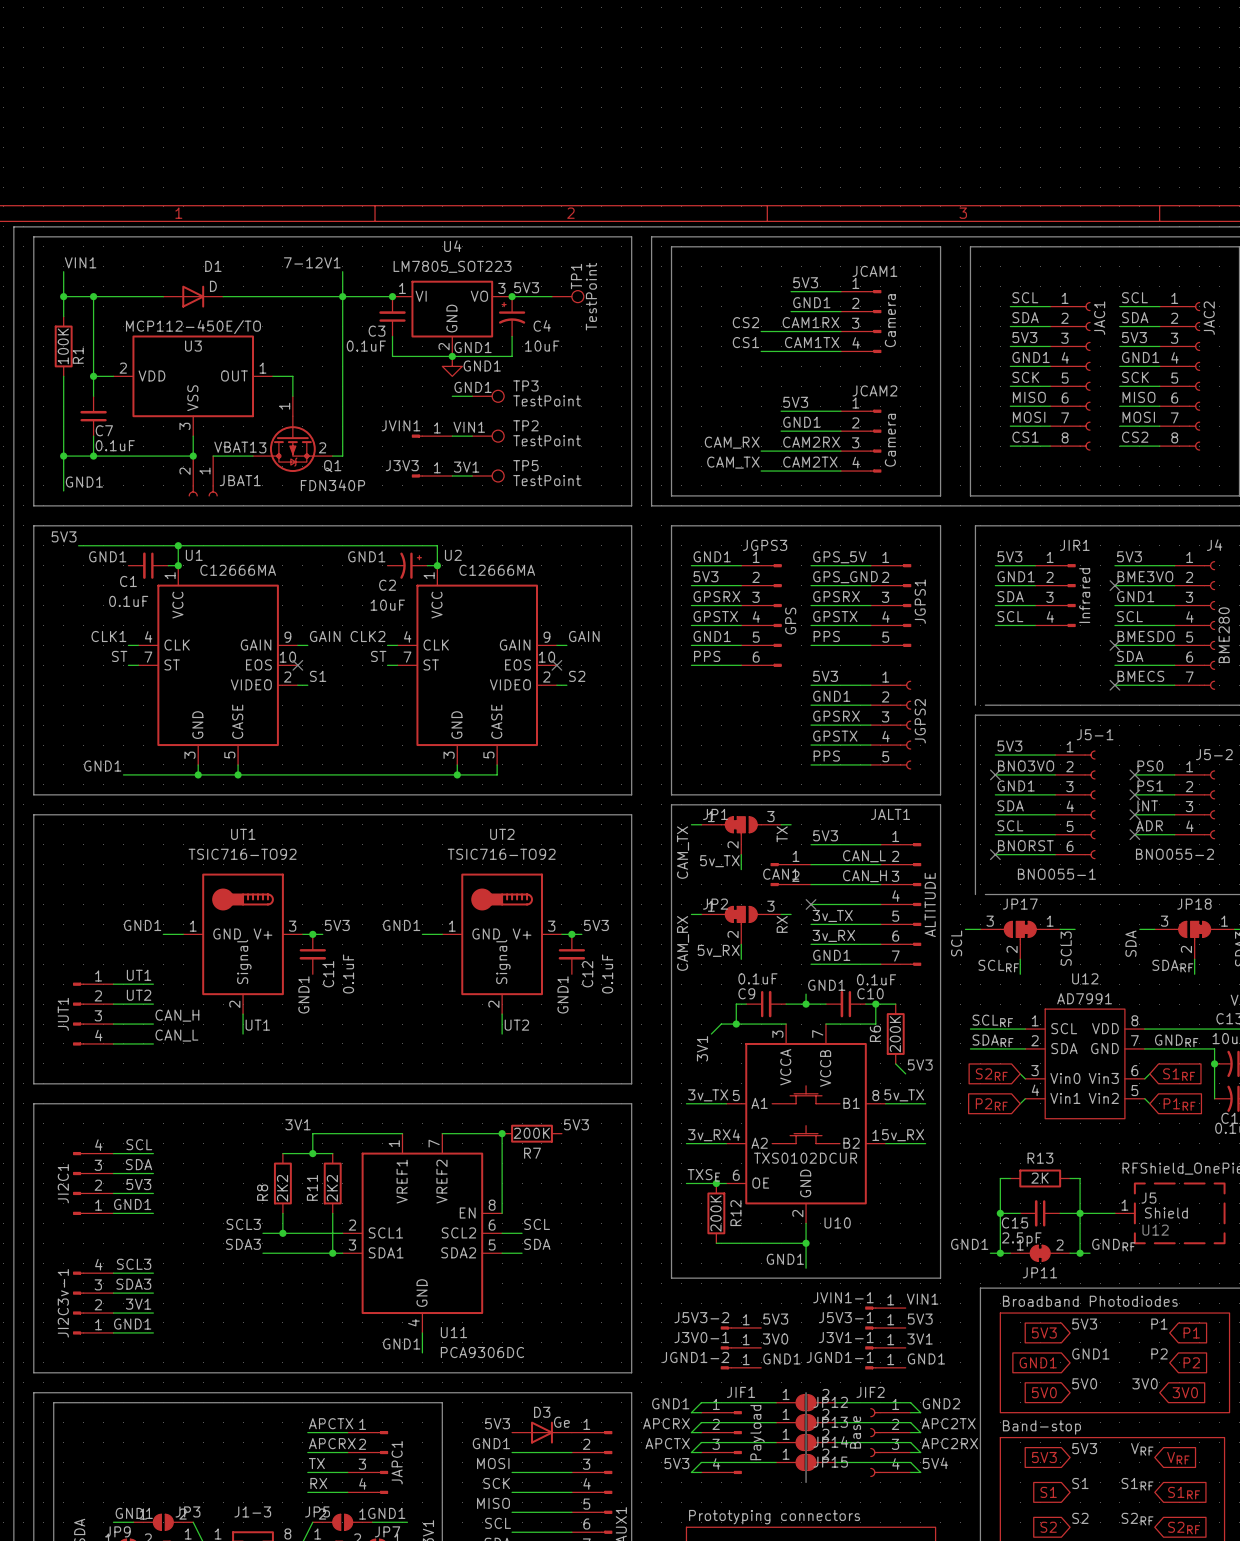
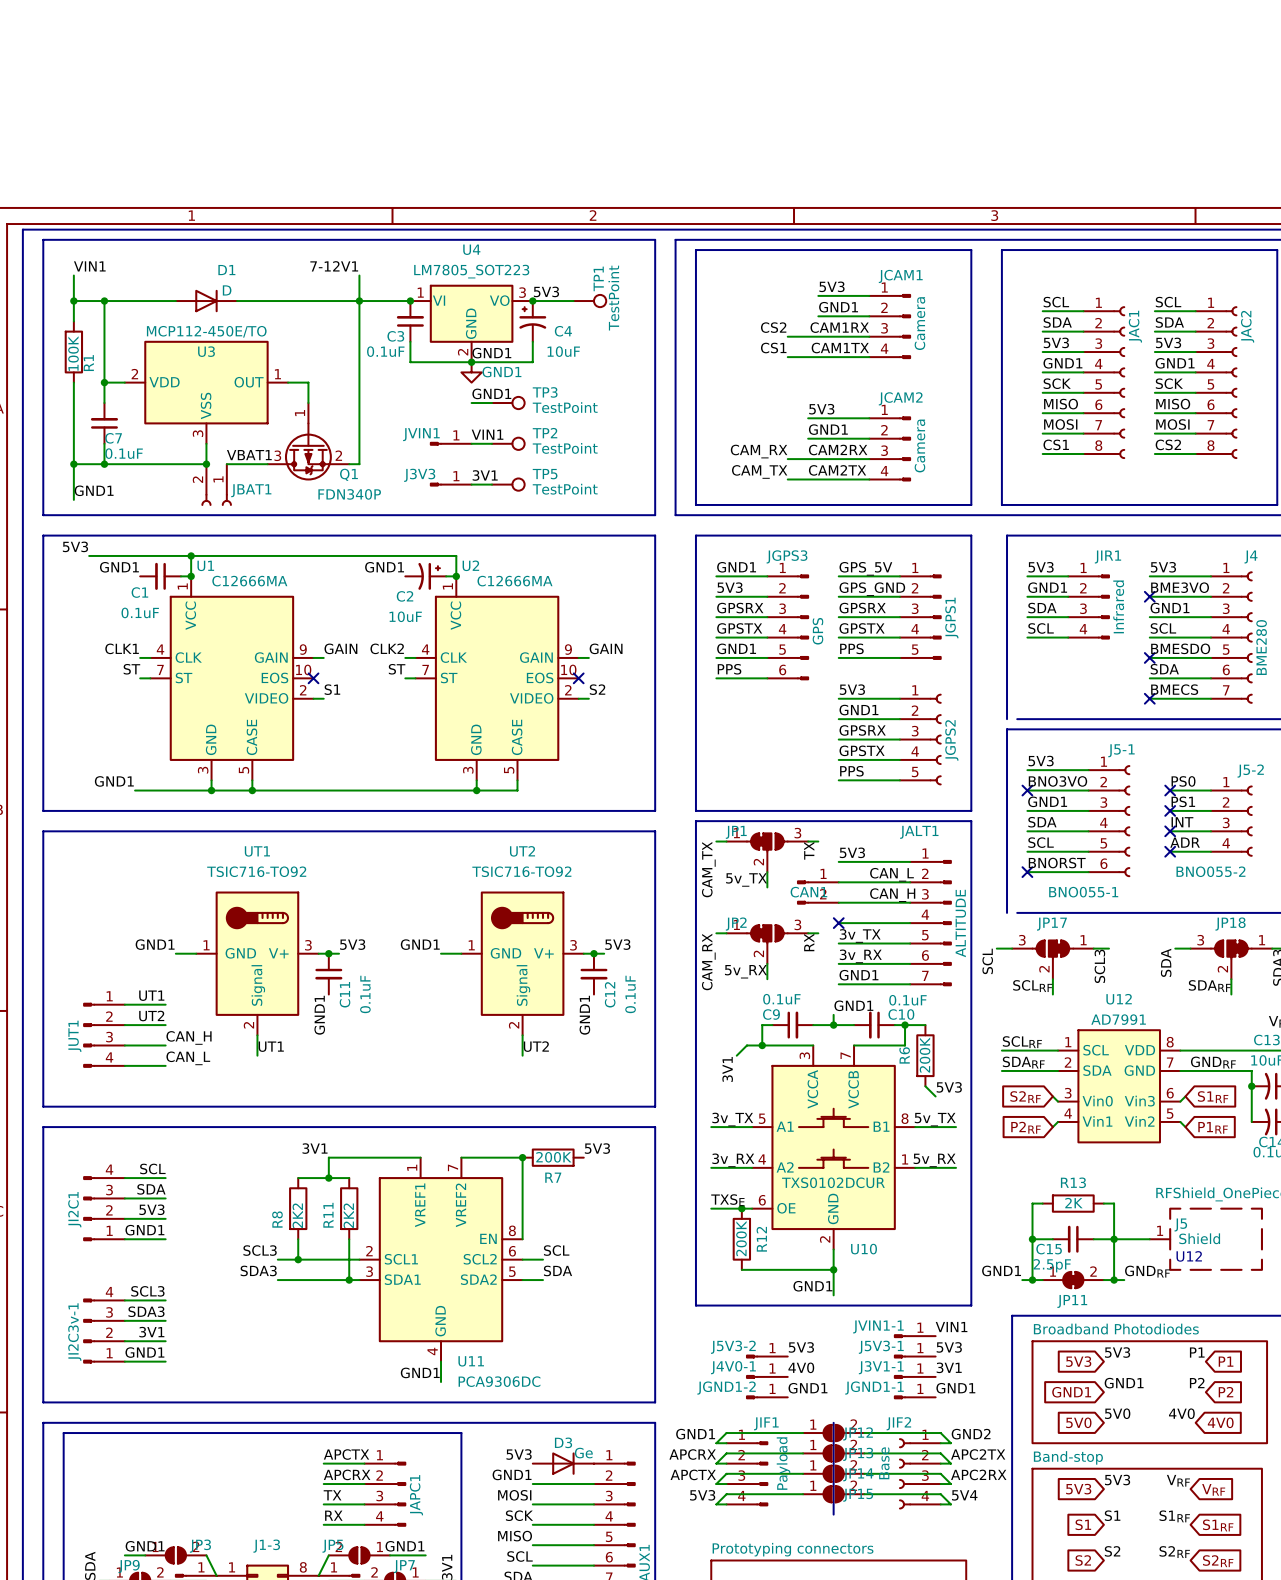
J3V0-1 name: J3V0-1 (701, 1337) -> J4V0-1 (733, 1367)
label: 3V0 (775, 1339) -> 4V0 (801, 1367)
label: 3V0 (1145, 1383) -> 4V0 (1181, 1413)
global label: 3V0 (1185, 1392) -> 4V0 (1220, 1422)

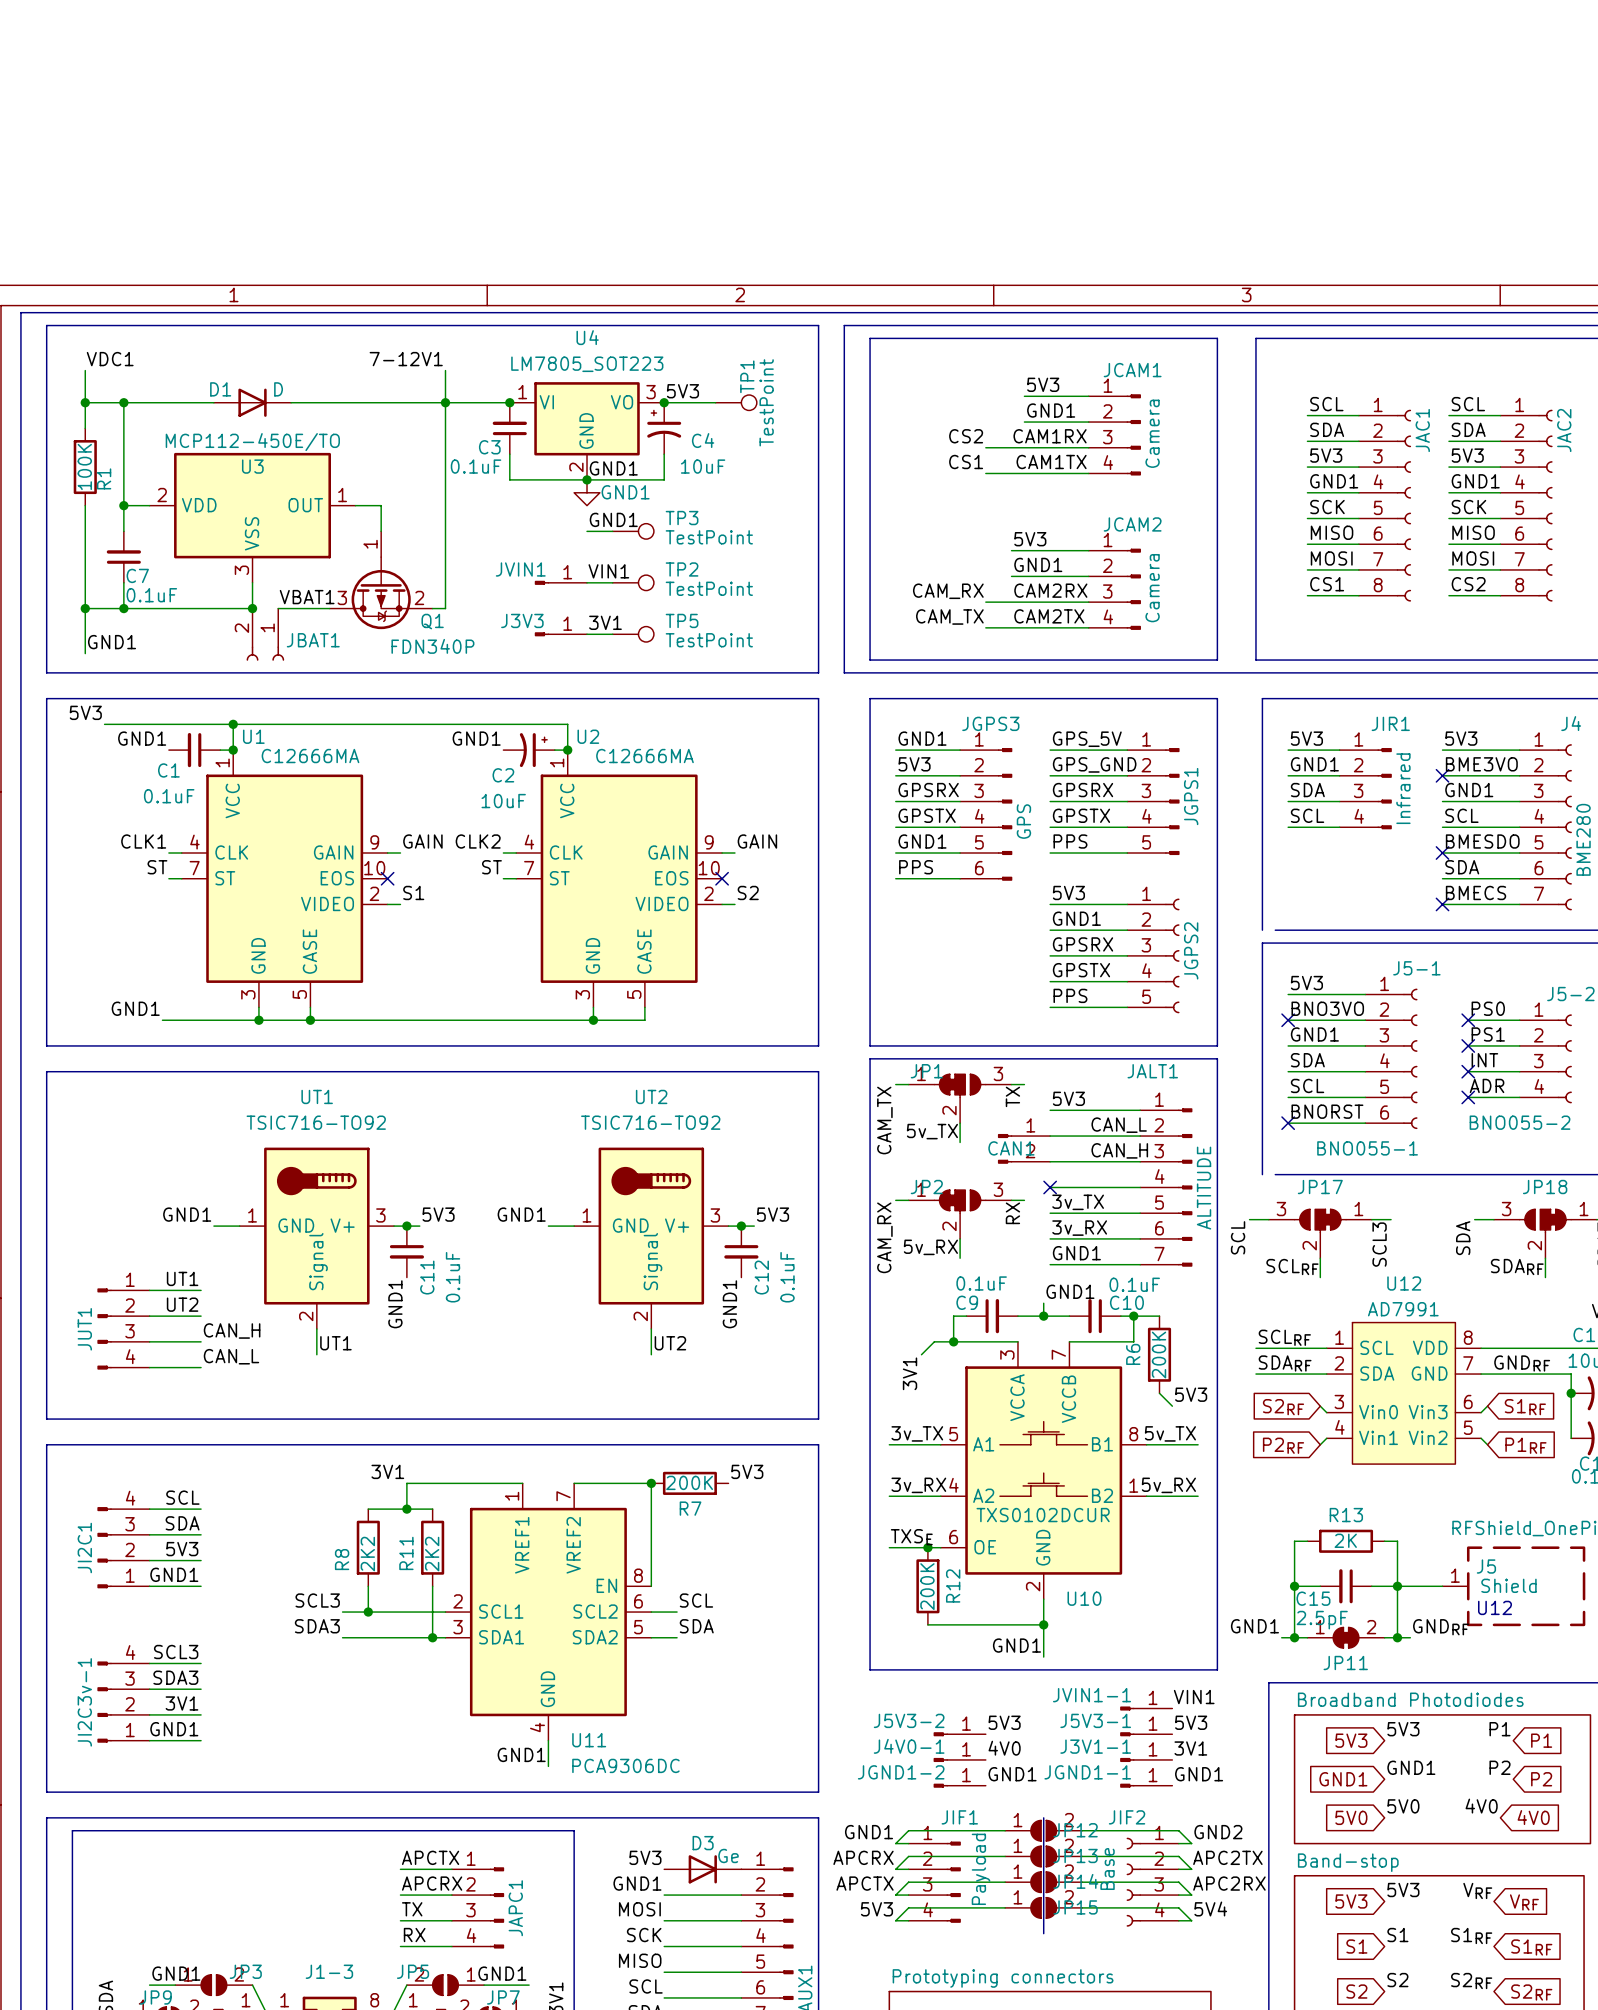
label: VIN1 (89, 266) -> VDC1 (110, 359)
D1 name position: D1 (226, 270) -> D1 (220, 389)

